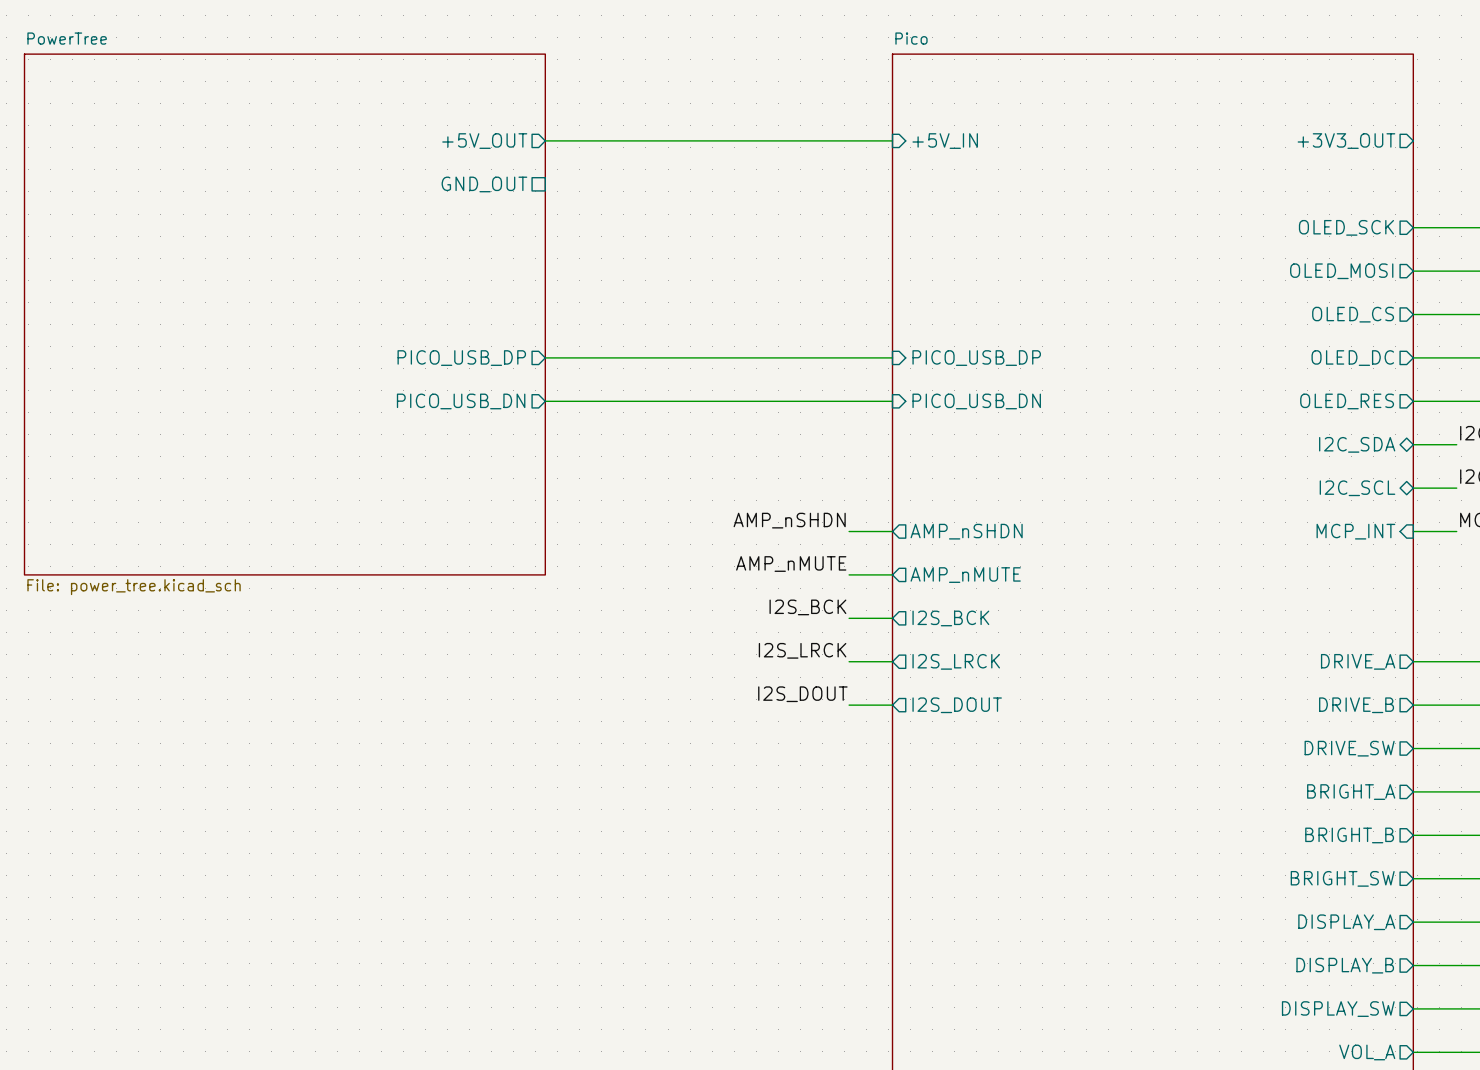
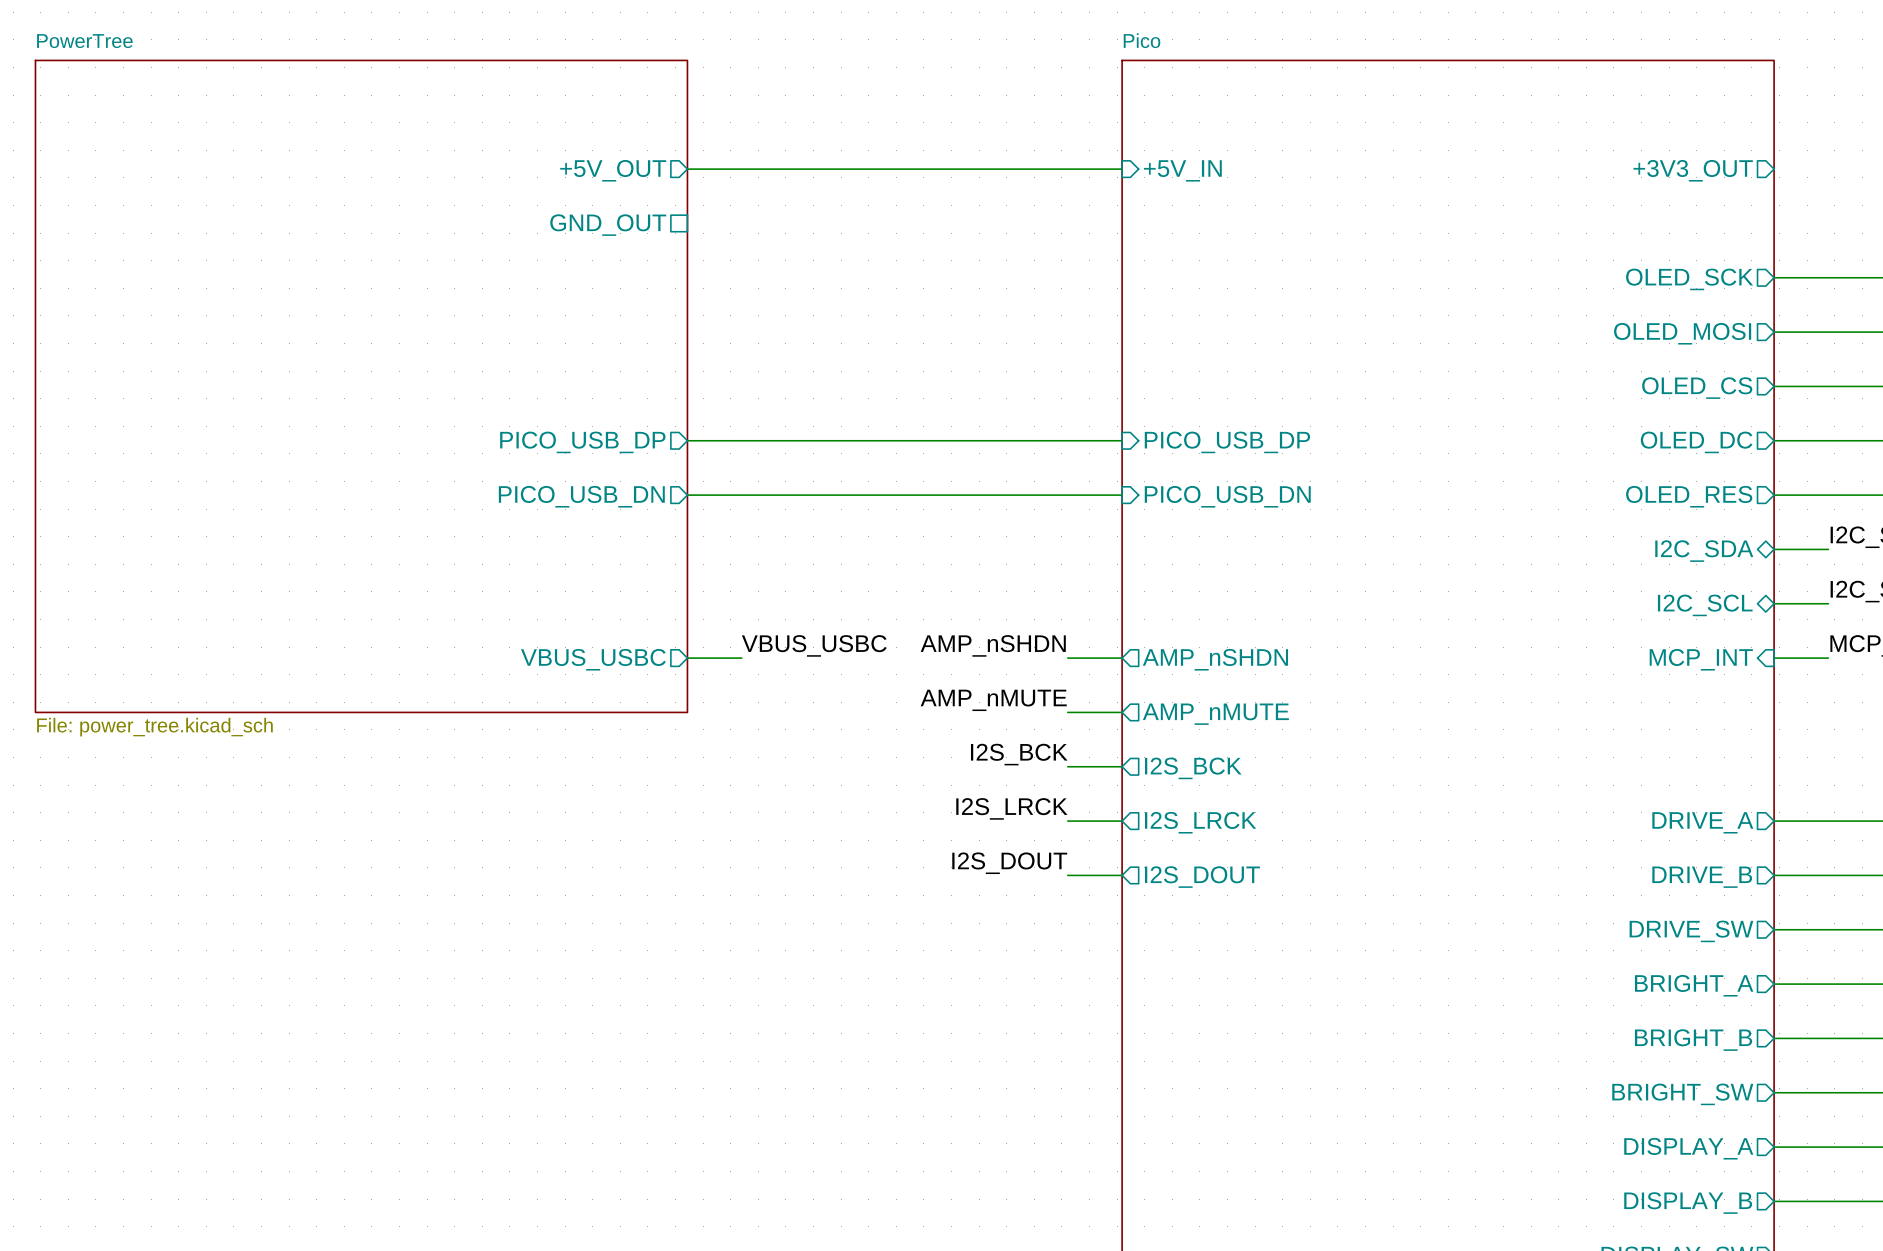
label: none -> VBUS_USBC (814, 645)
sheet pin: none -> VBUS_USBC (593, 659)
wire: none -> (687, 658) (741, 658)

